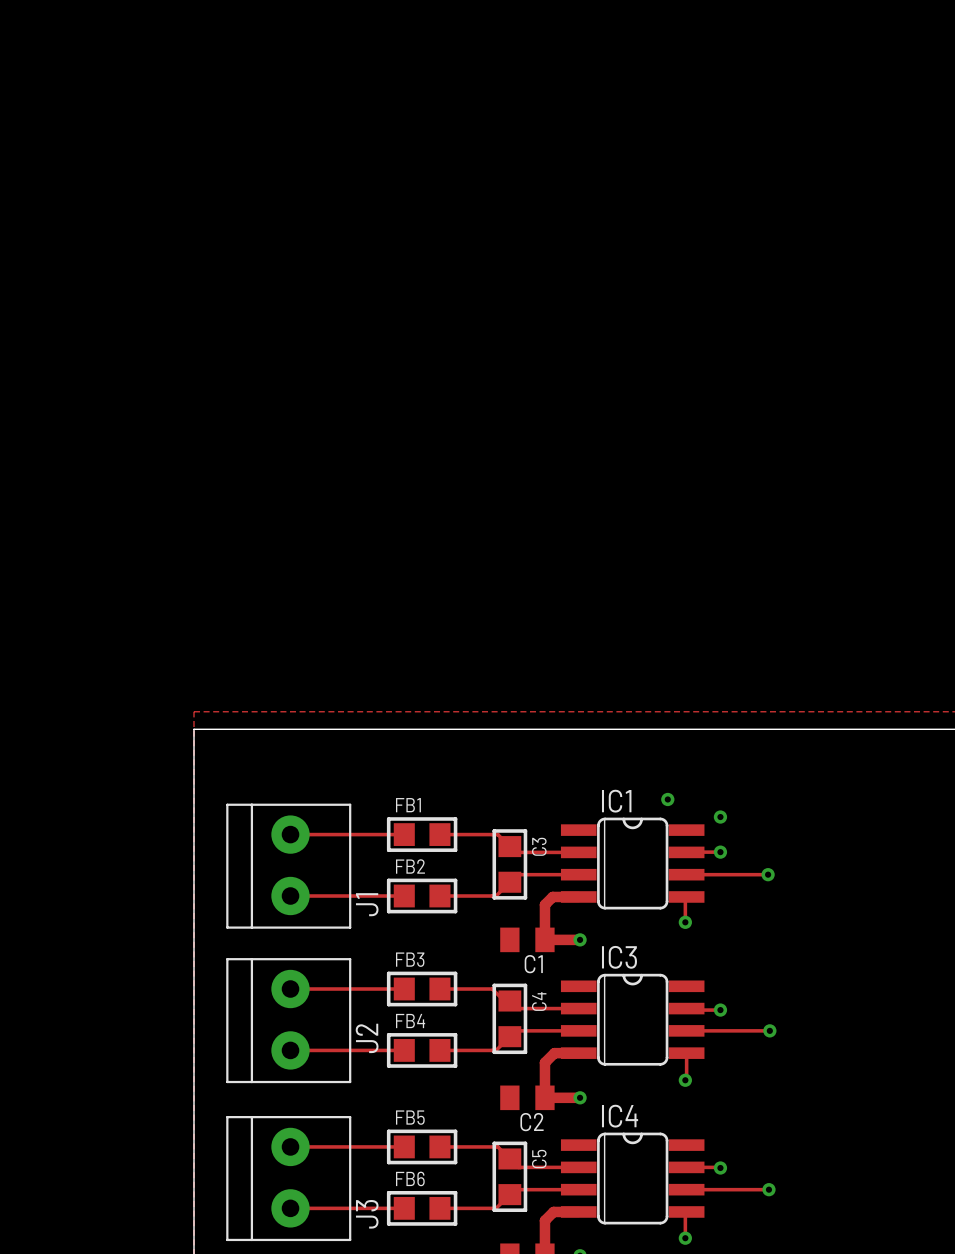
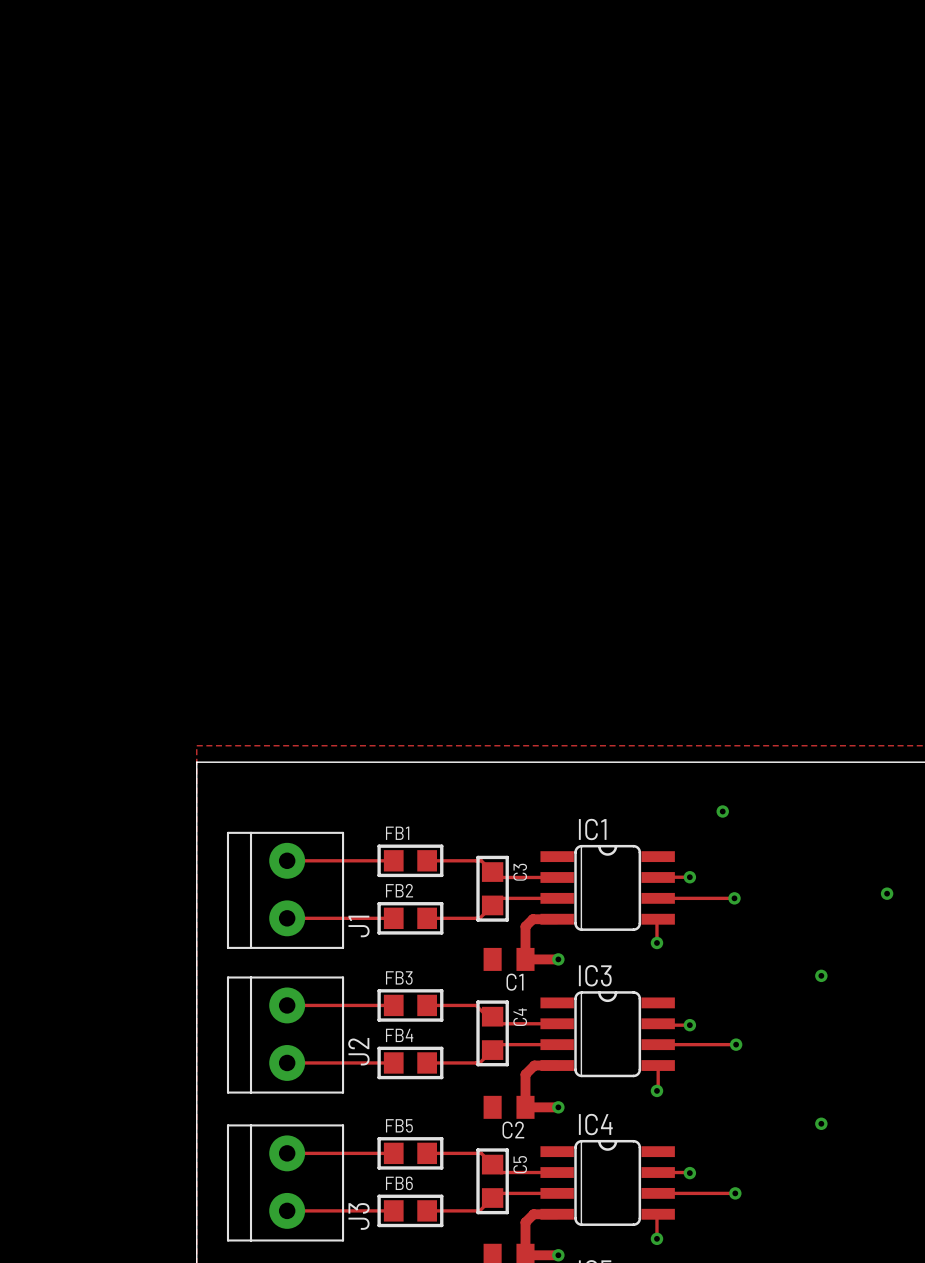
via: none -> (722, 811)
via: (667, 799) -> none
via: (720, 817) -> none
via: none -> (887, 893)
via: none -> (821, 975)
via: none -> (821, 1123)

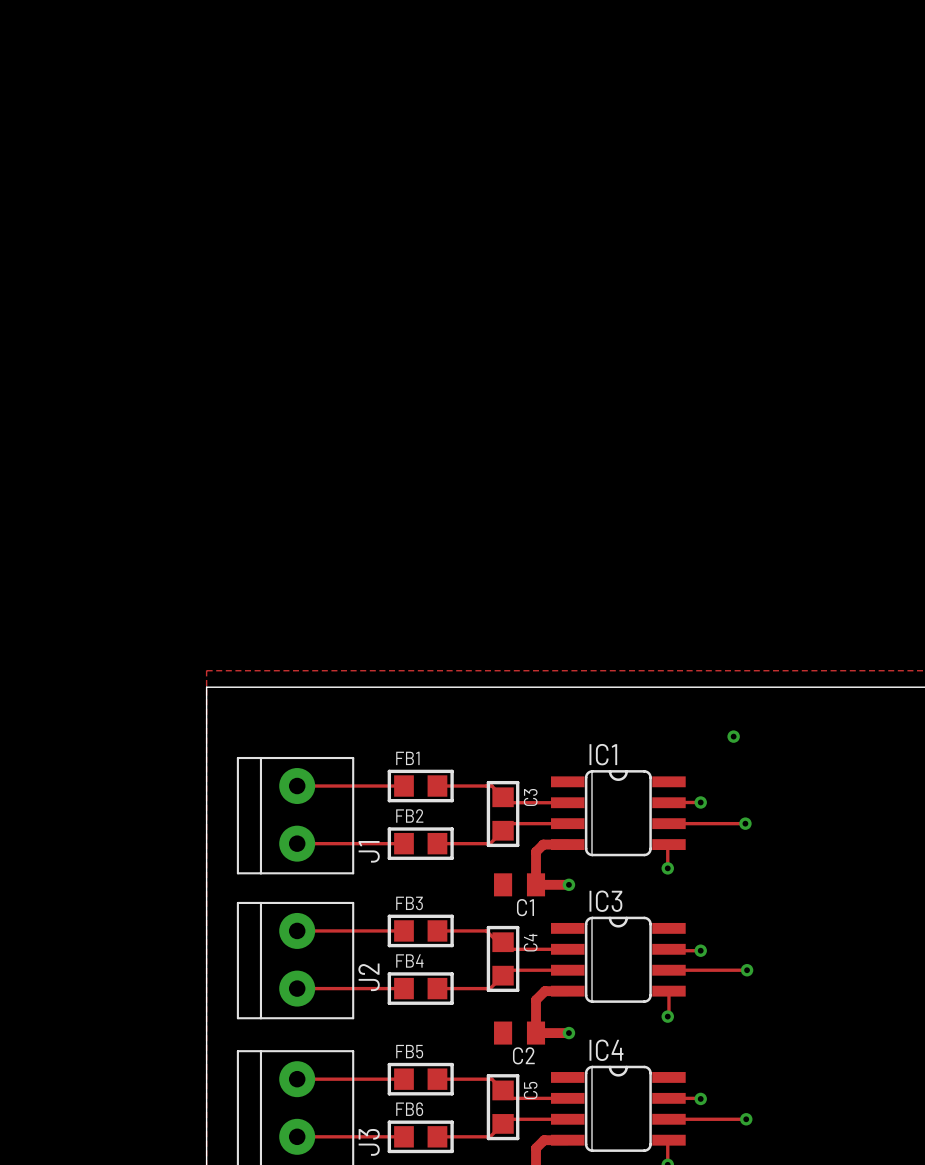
via: (887, 893) -> none
via: (821, 975) -> none
via: (821, 1123) -> none

